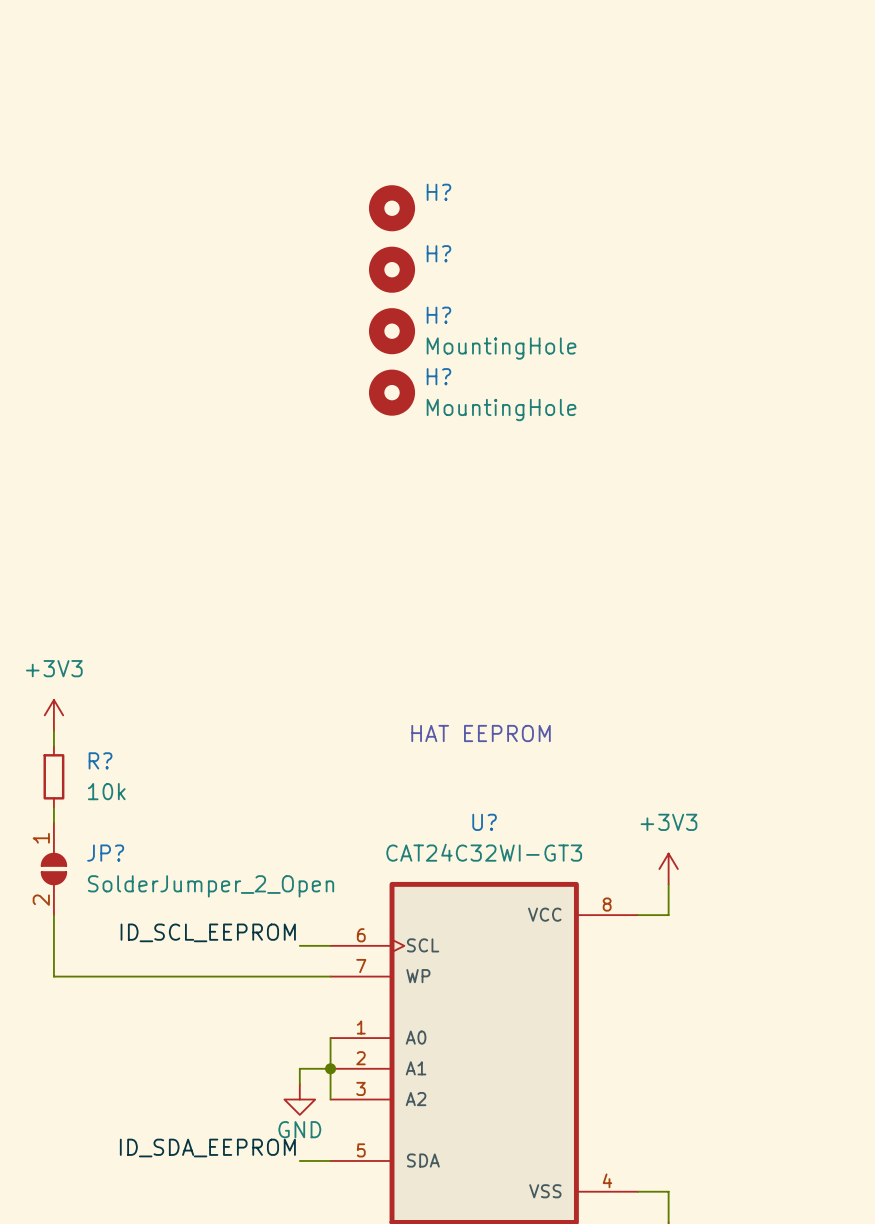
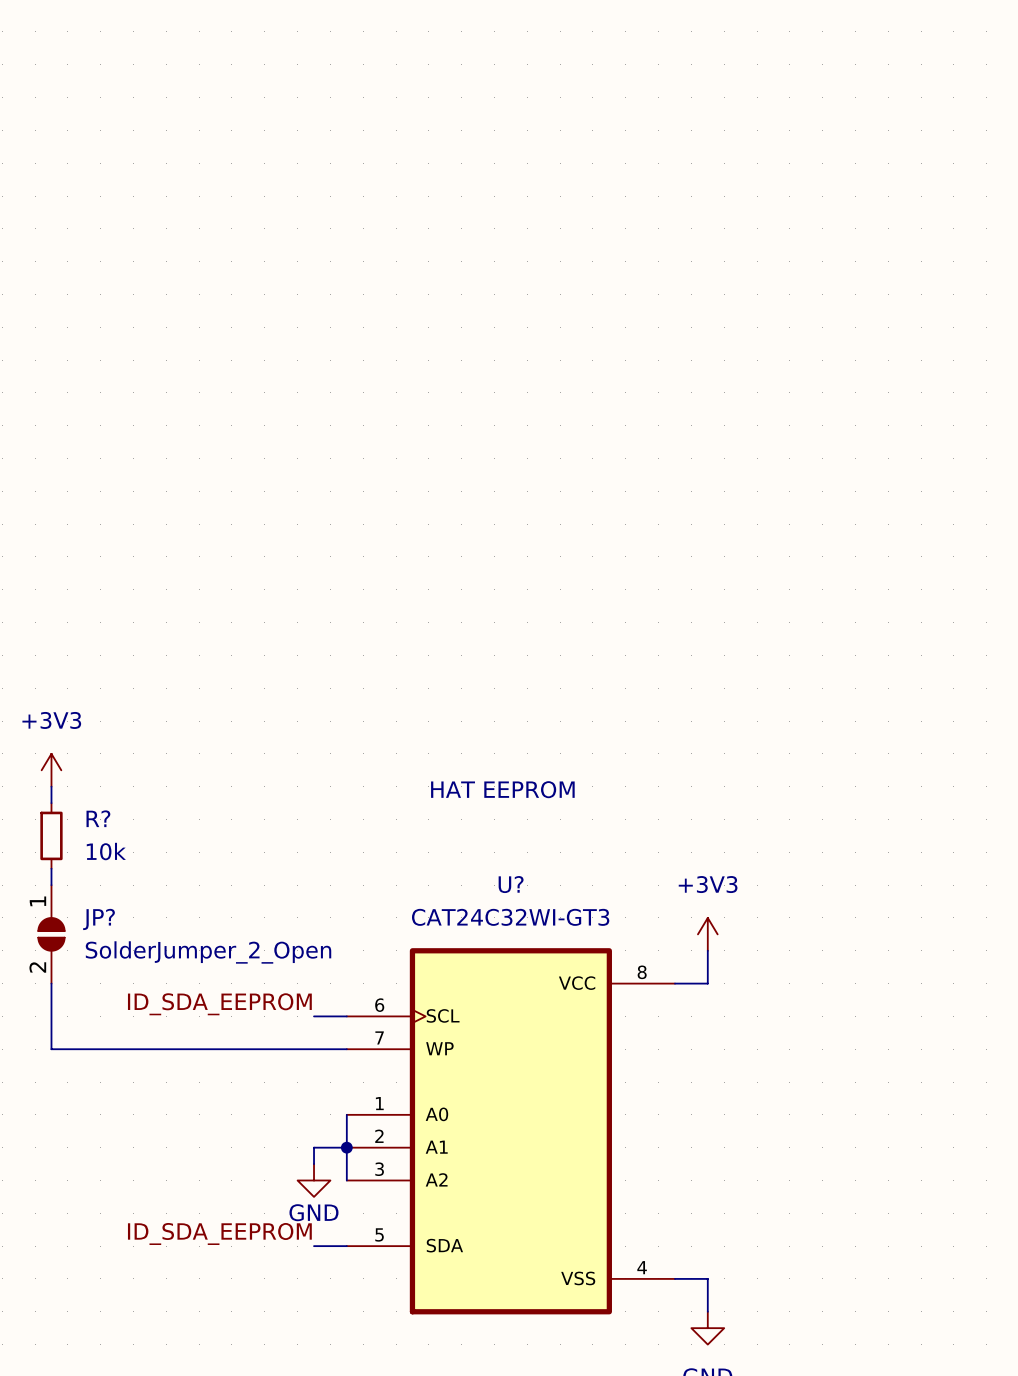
H?: (392, 208) -> none
H?: (392, 269) -> none
H?: MountingHole (392, 331) -> none
H?: MountingHole (392, 392) -> none
label: ID_SCL_EEPROM (208, 932) -> ID_SDA_EEPROM (219, 1004)

